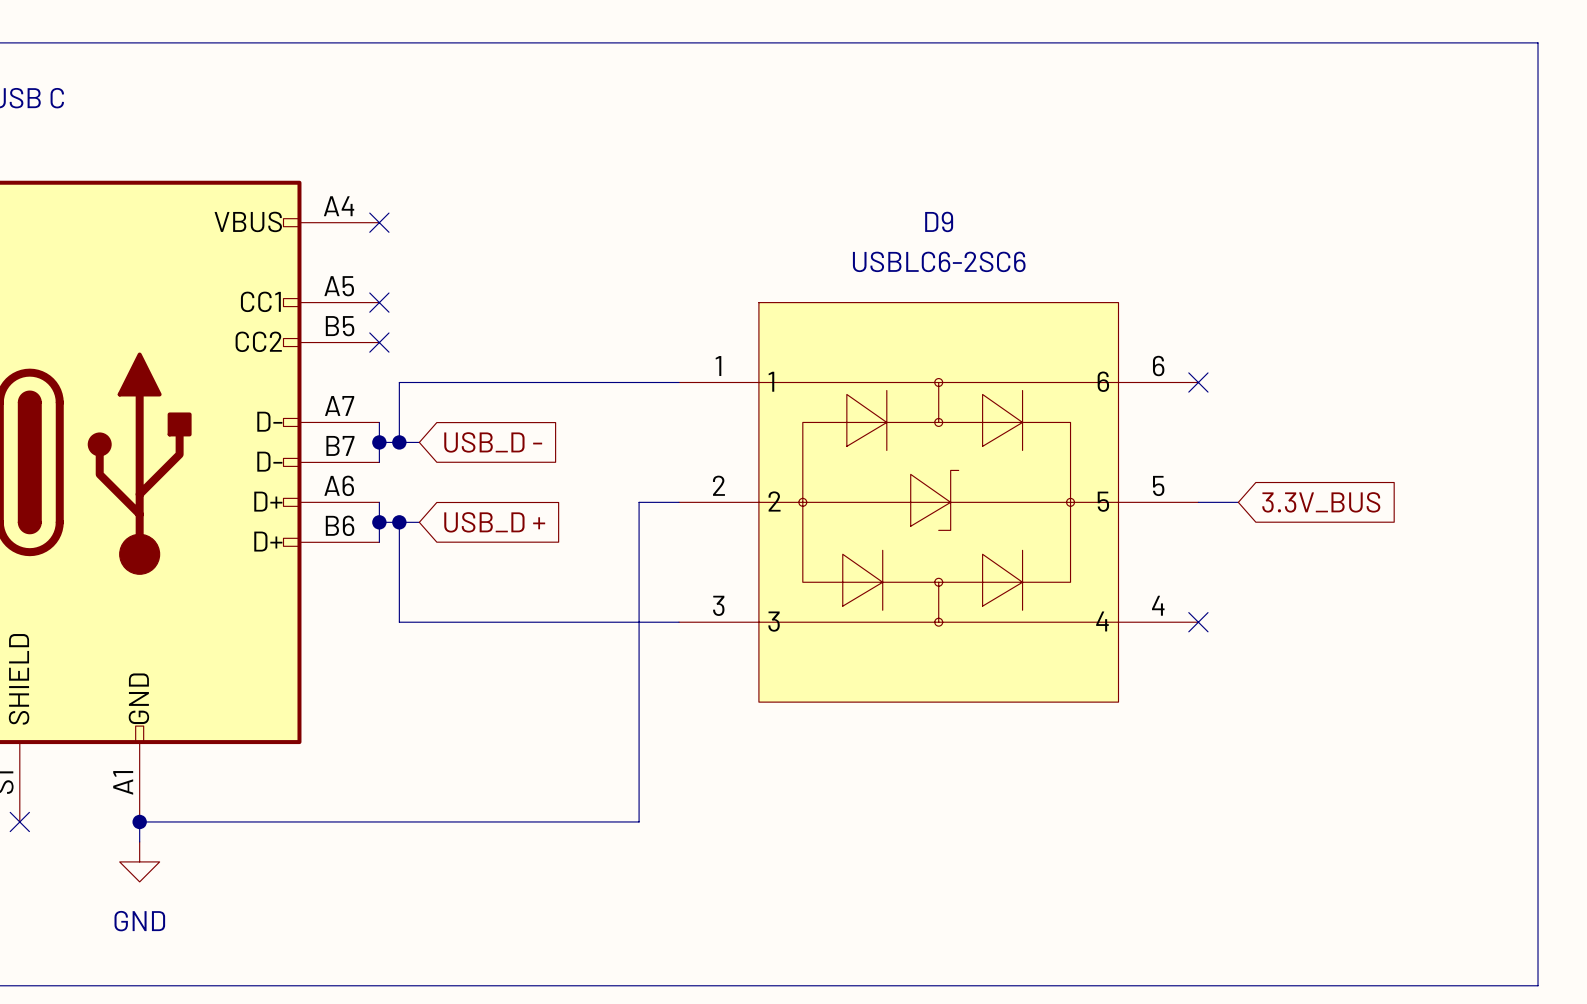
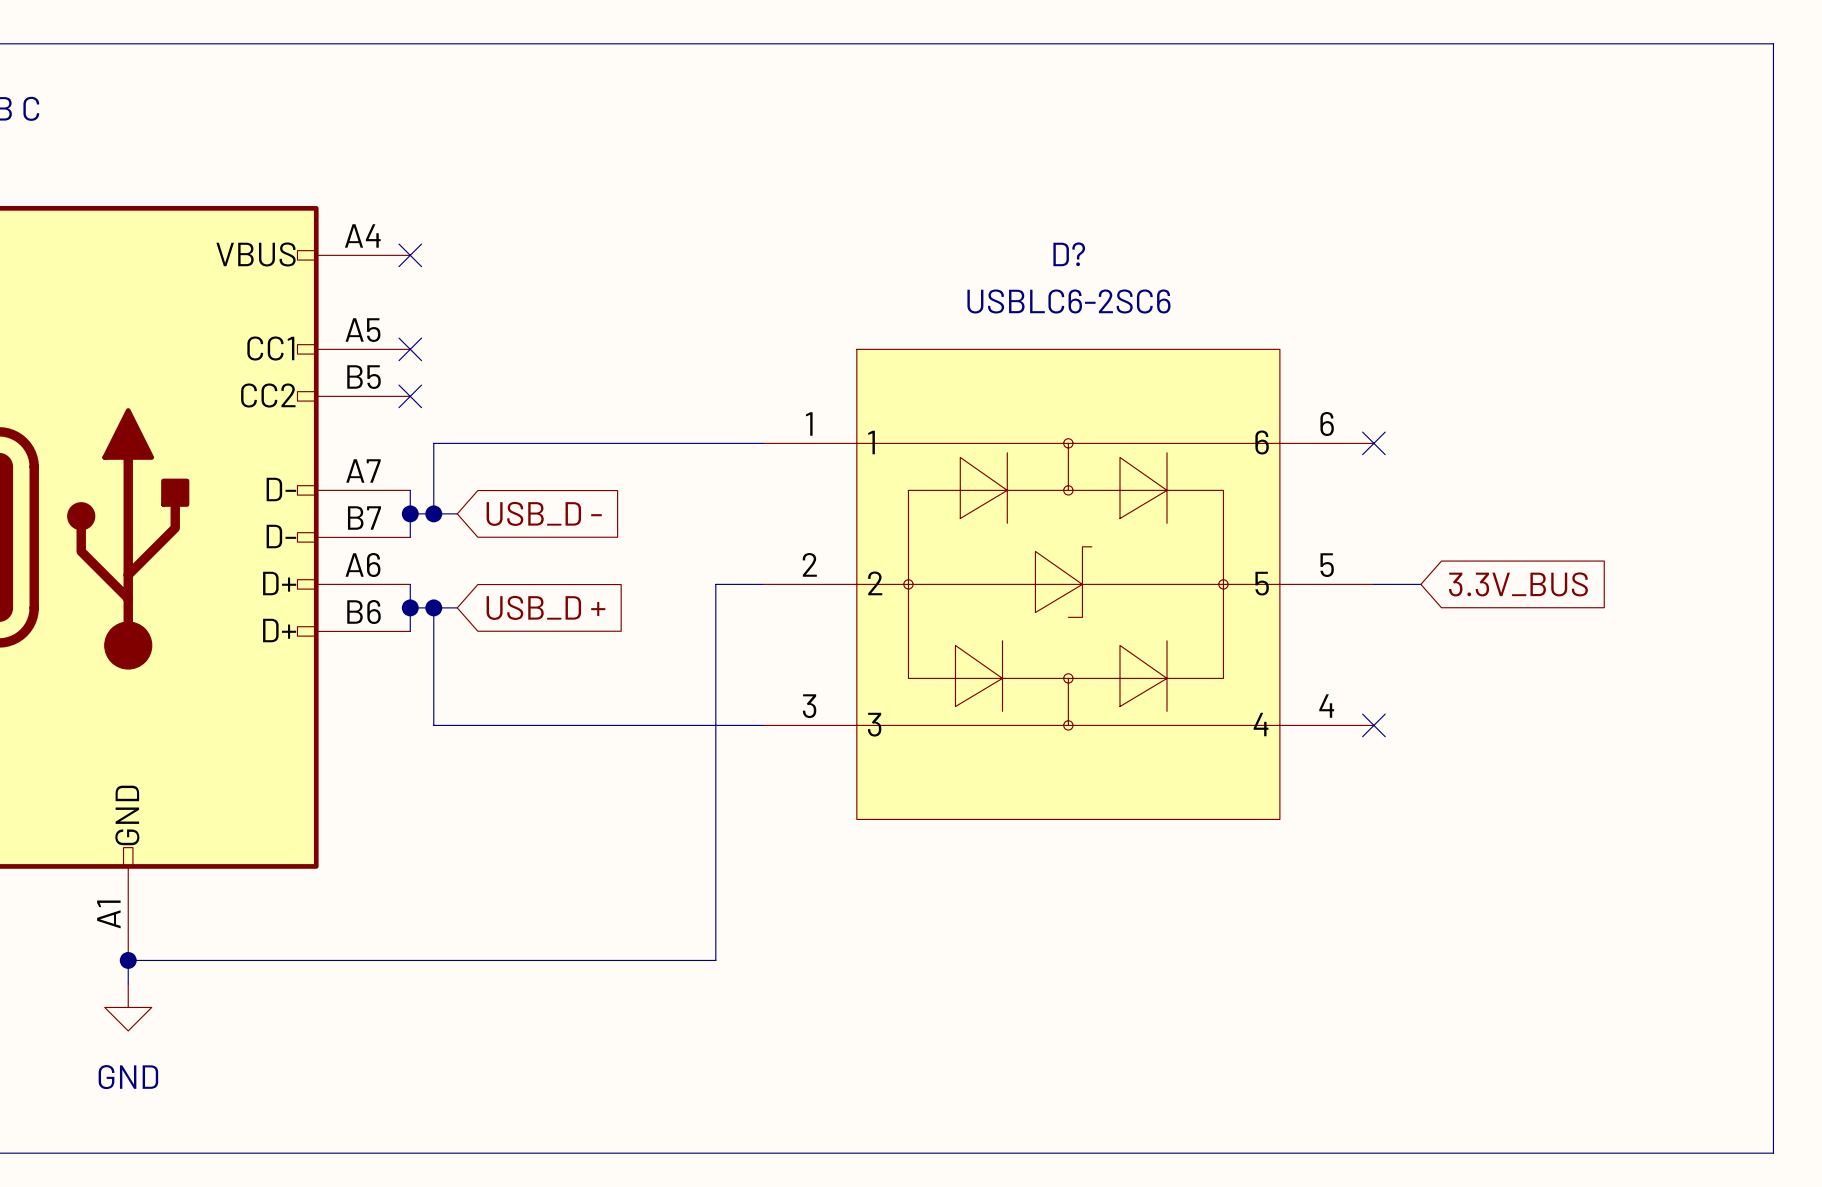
D9 name: D9 (939, 221) -> D? (1069, 254)

